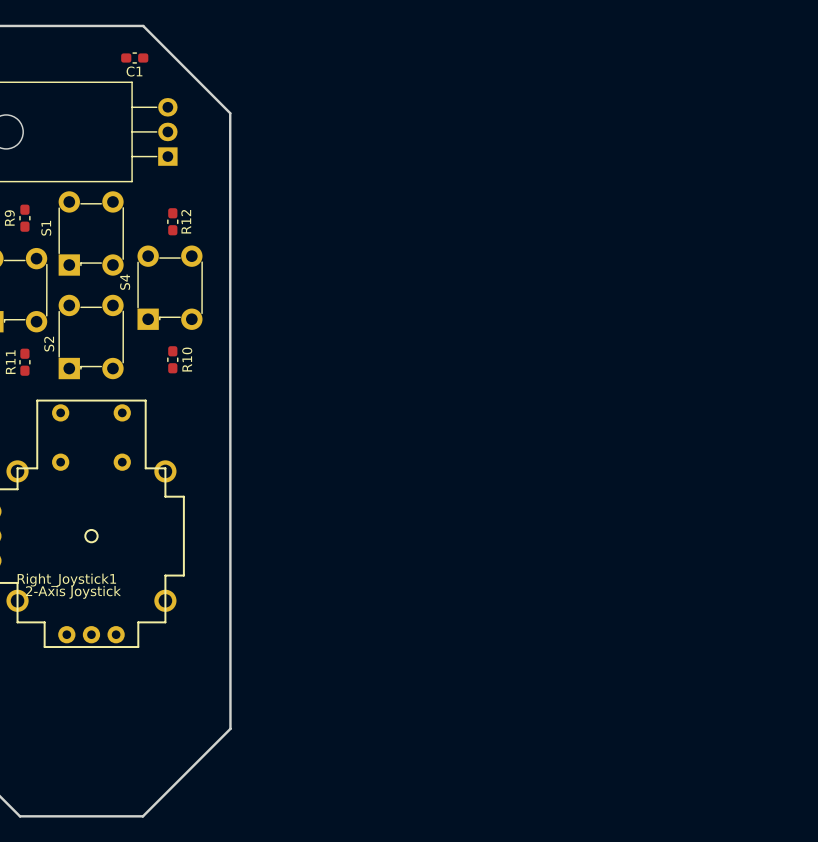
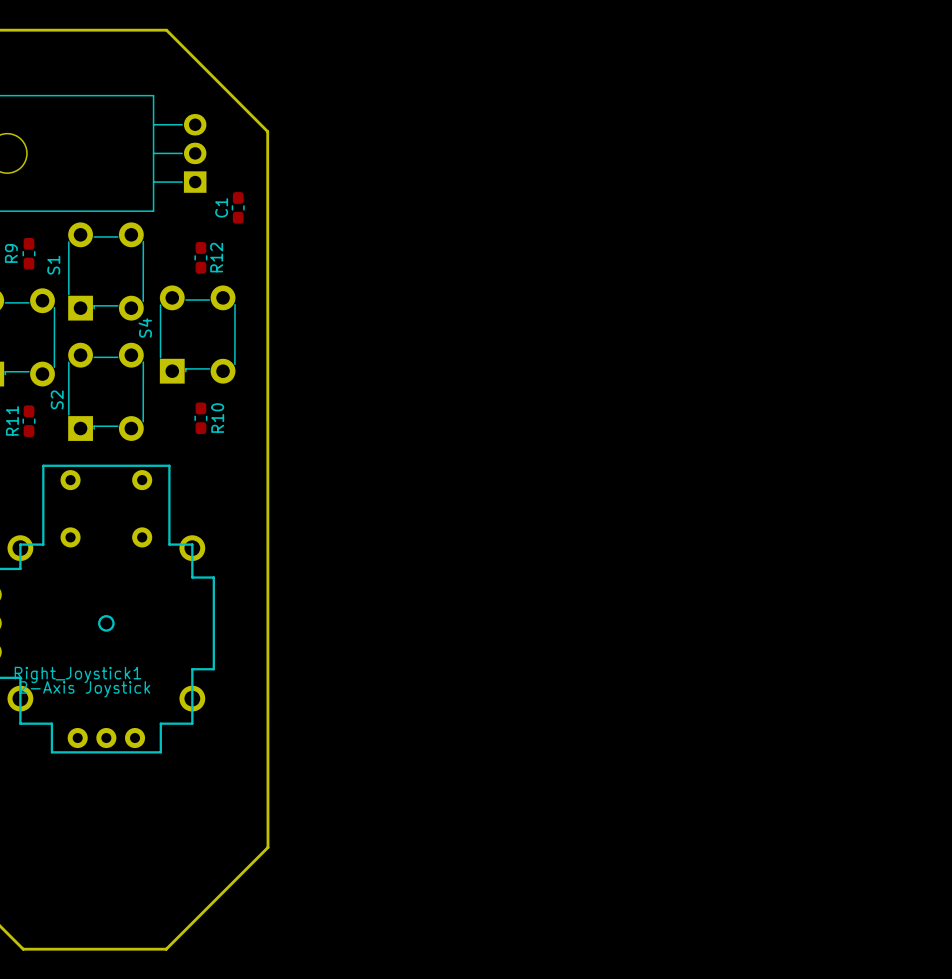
C1 rotation: 0° (134, 58) -> 90° clockwise (238, 207)
C1 position: (134, 58) -> (238, 207)

